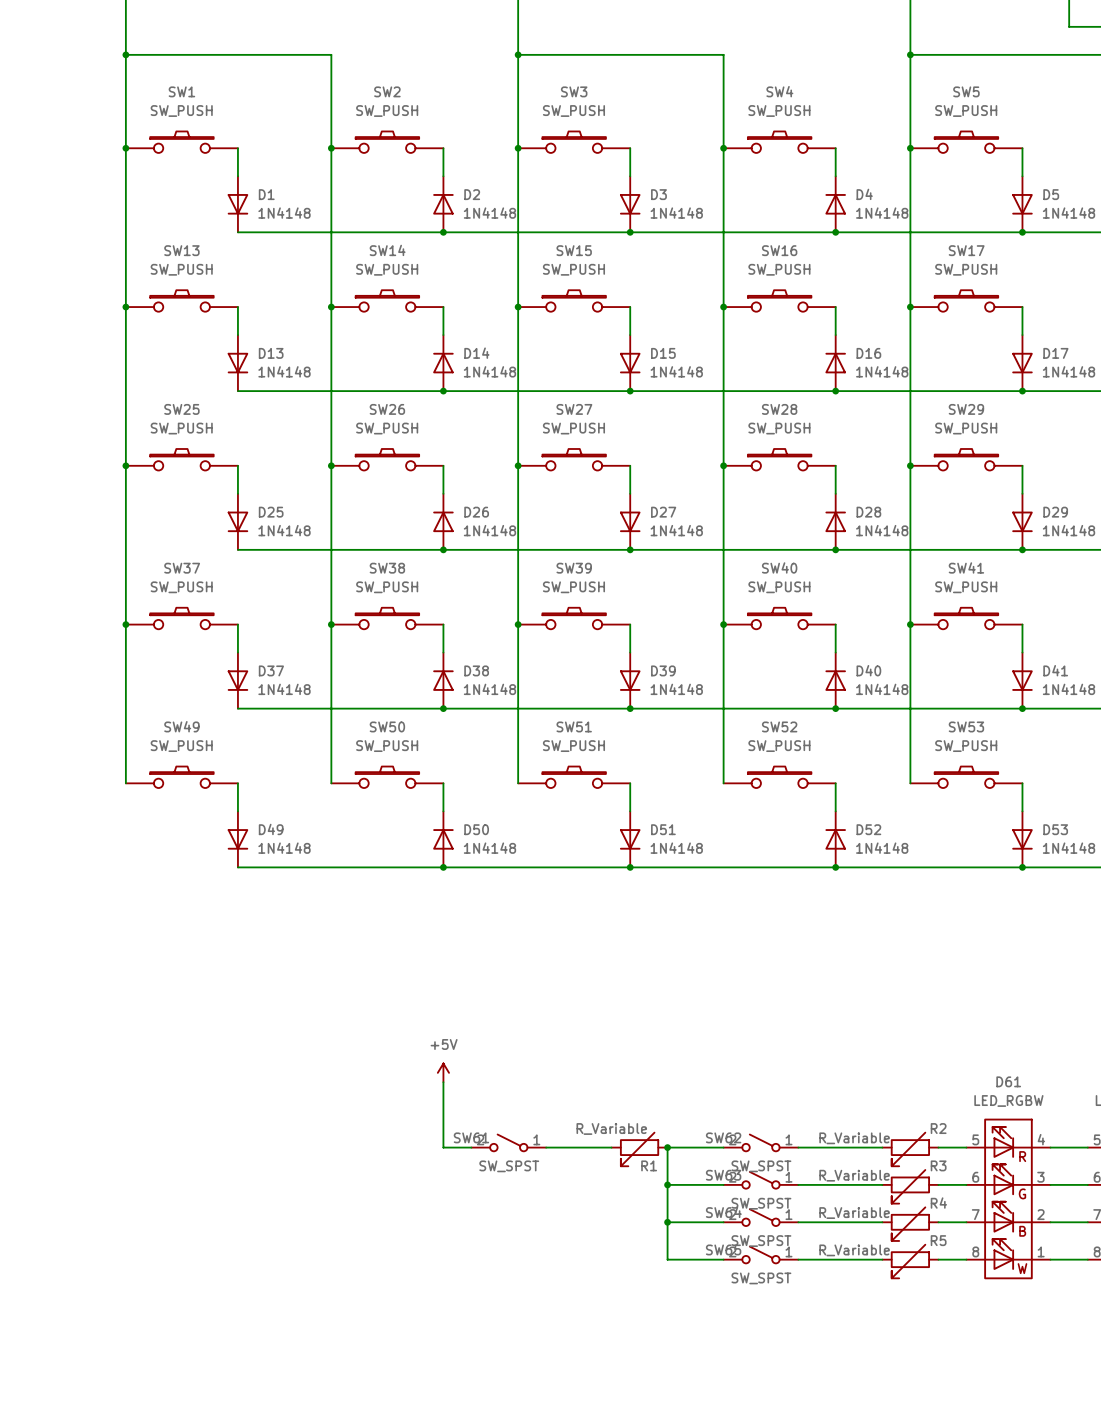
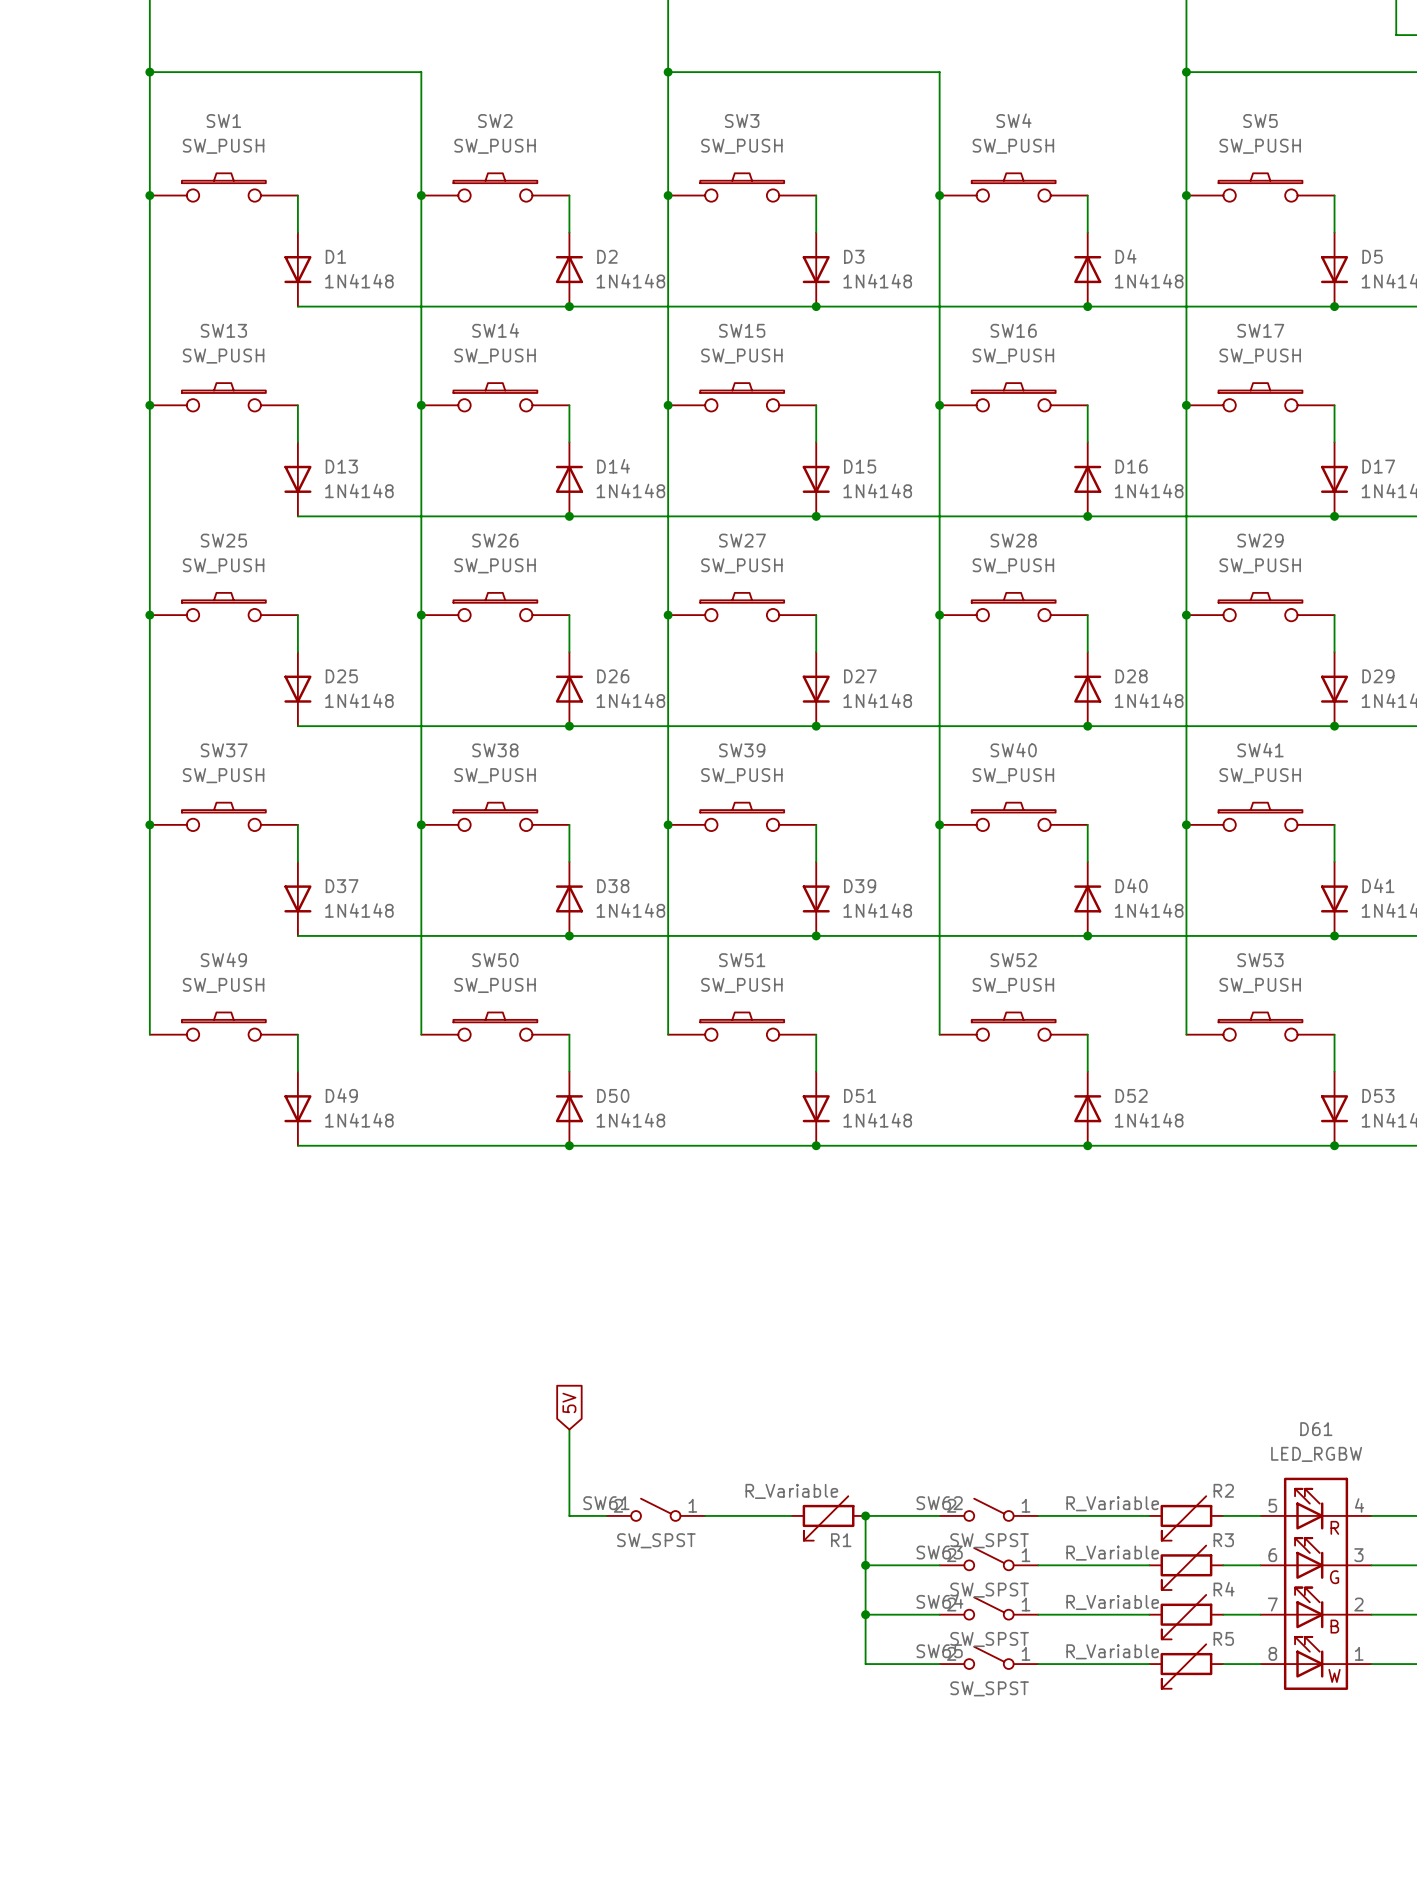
global label: none -> 5V (569, 1402)
power symbol: +5V (443, 1072) -> none

